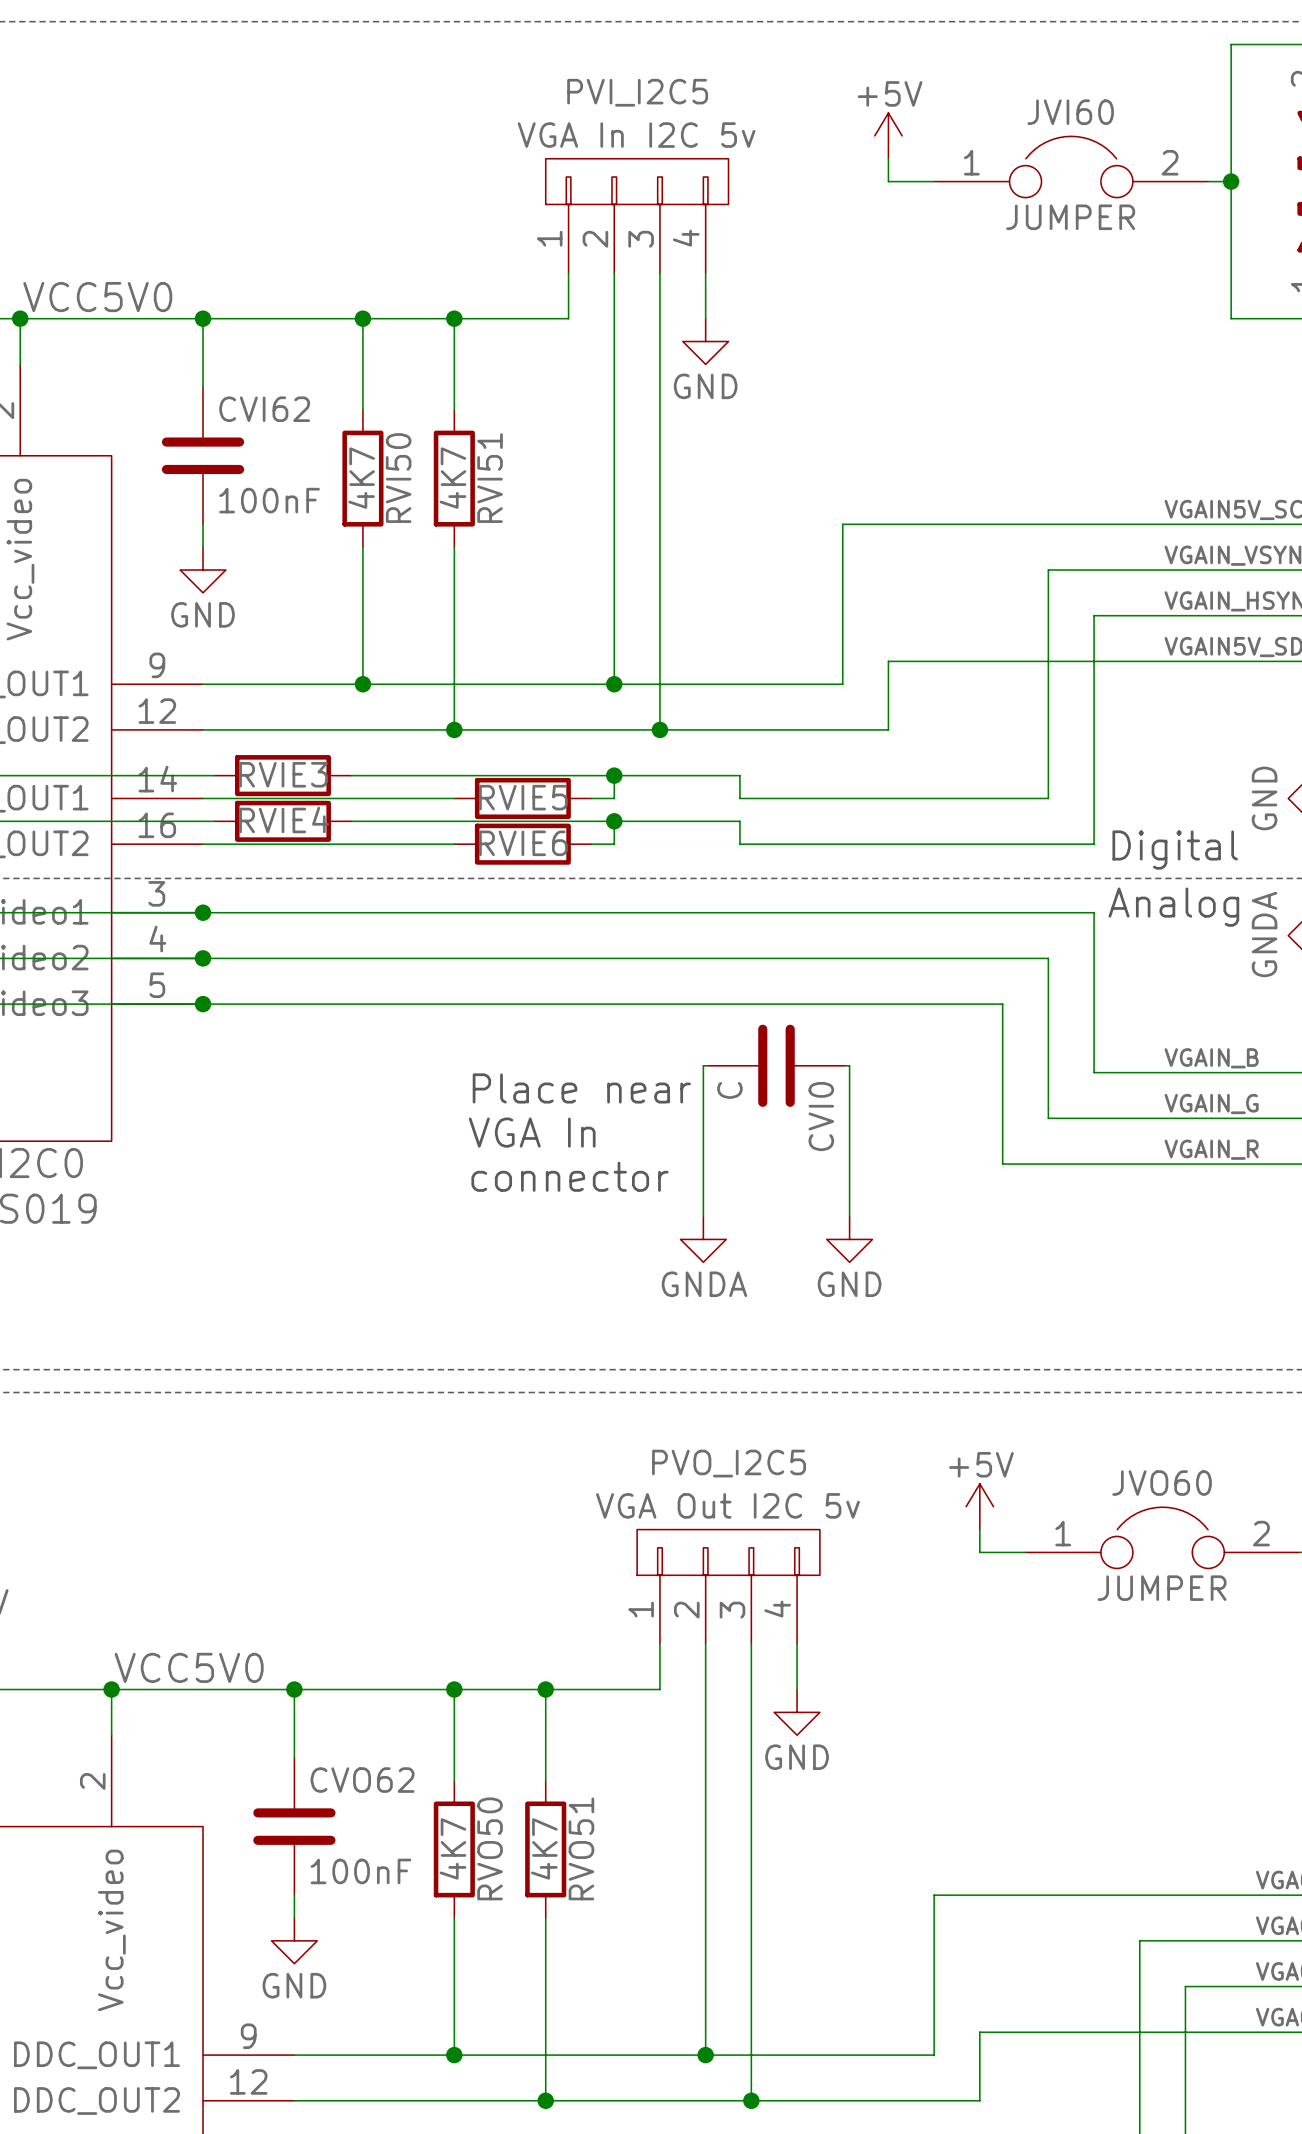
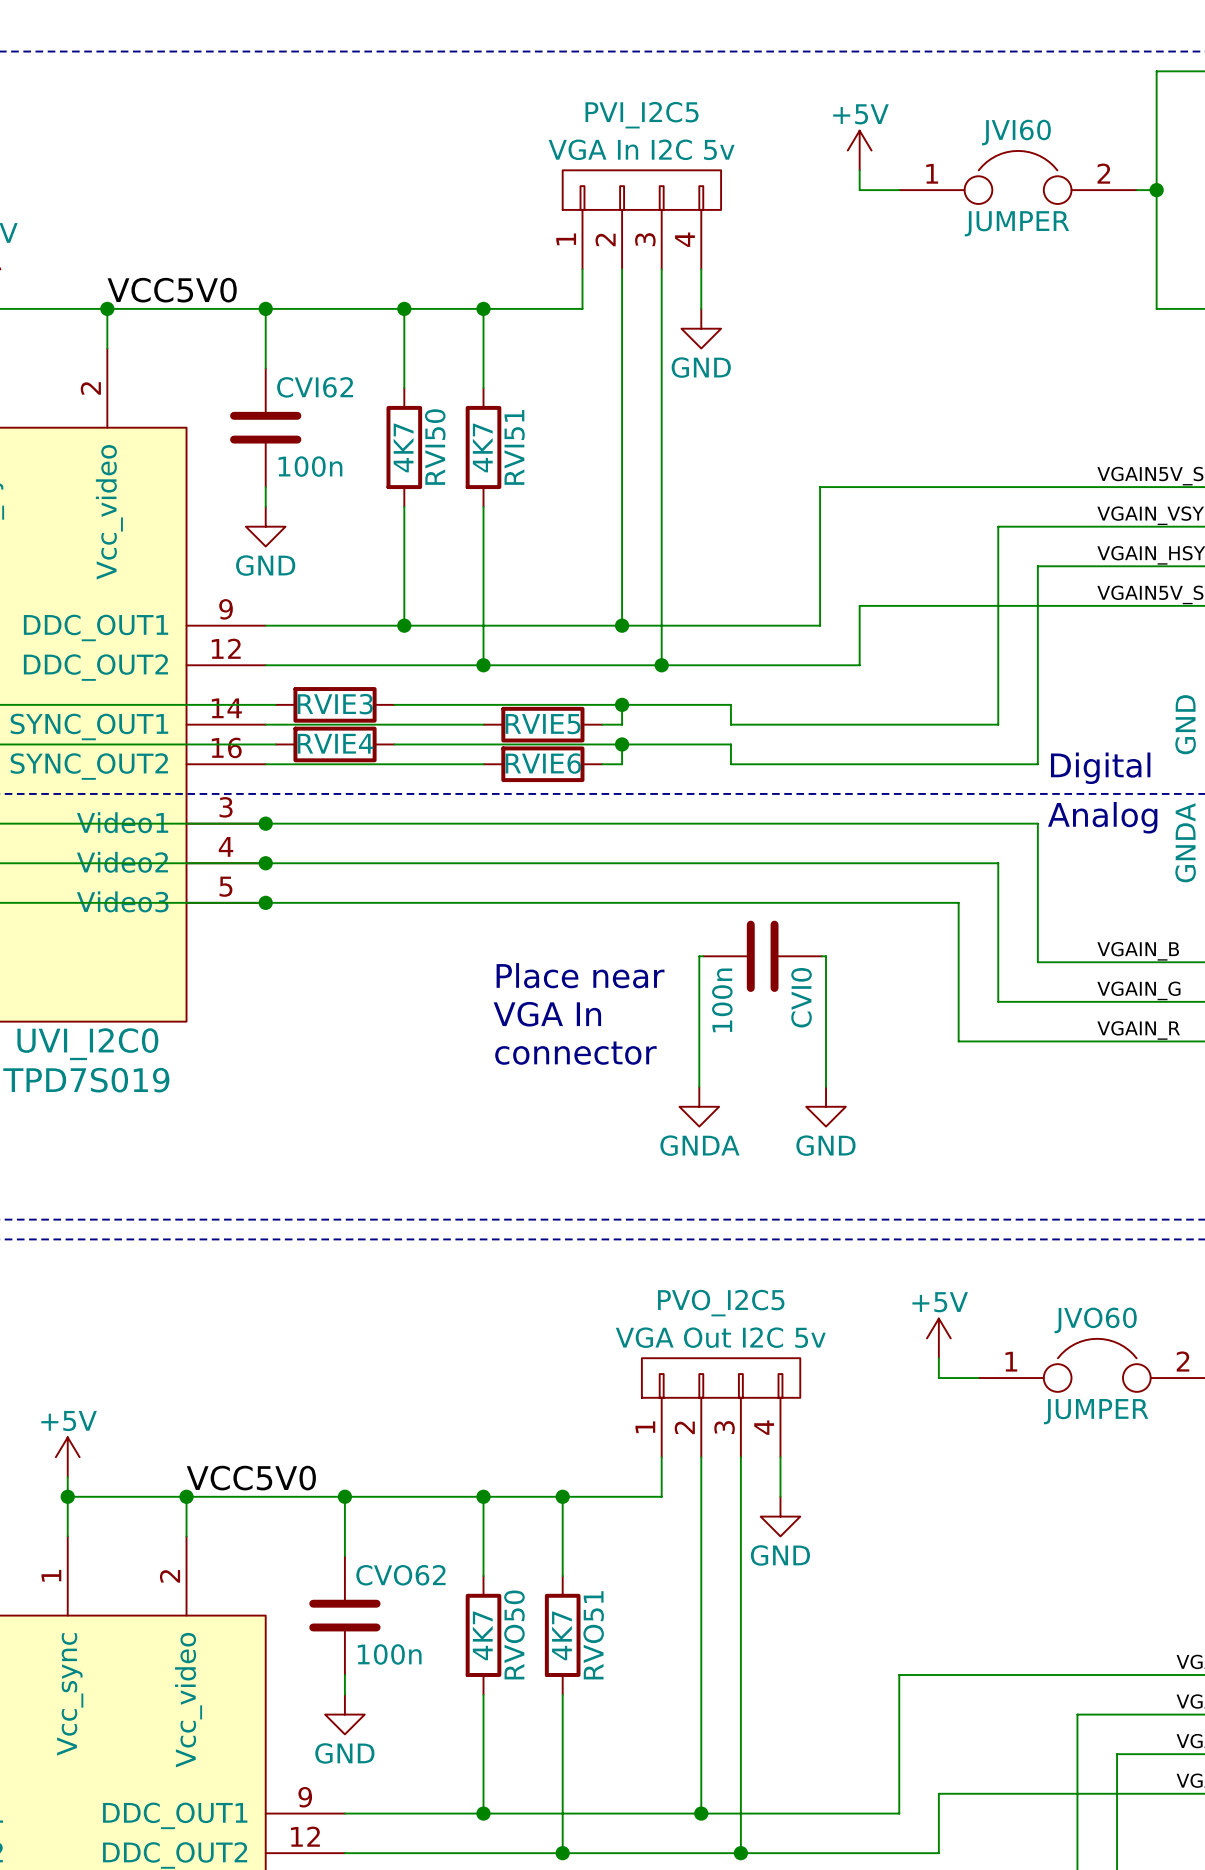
CVI62 value: 100nF (269, 500) -> 100n (310, 466)
CVI0 value: C (729, 1090) -> 100n (722, 1000)
CVO62 value: 100nF (360, 1871) -> 100n (389, 1654)

